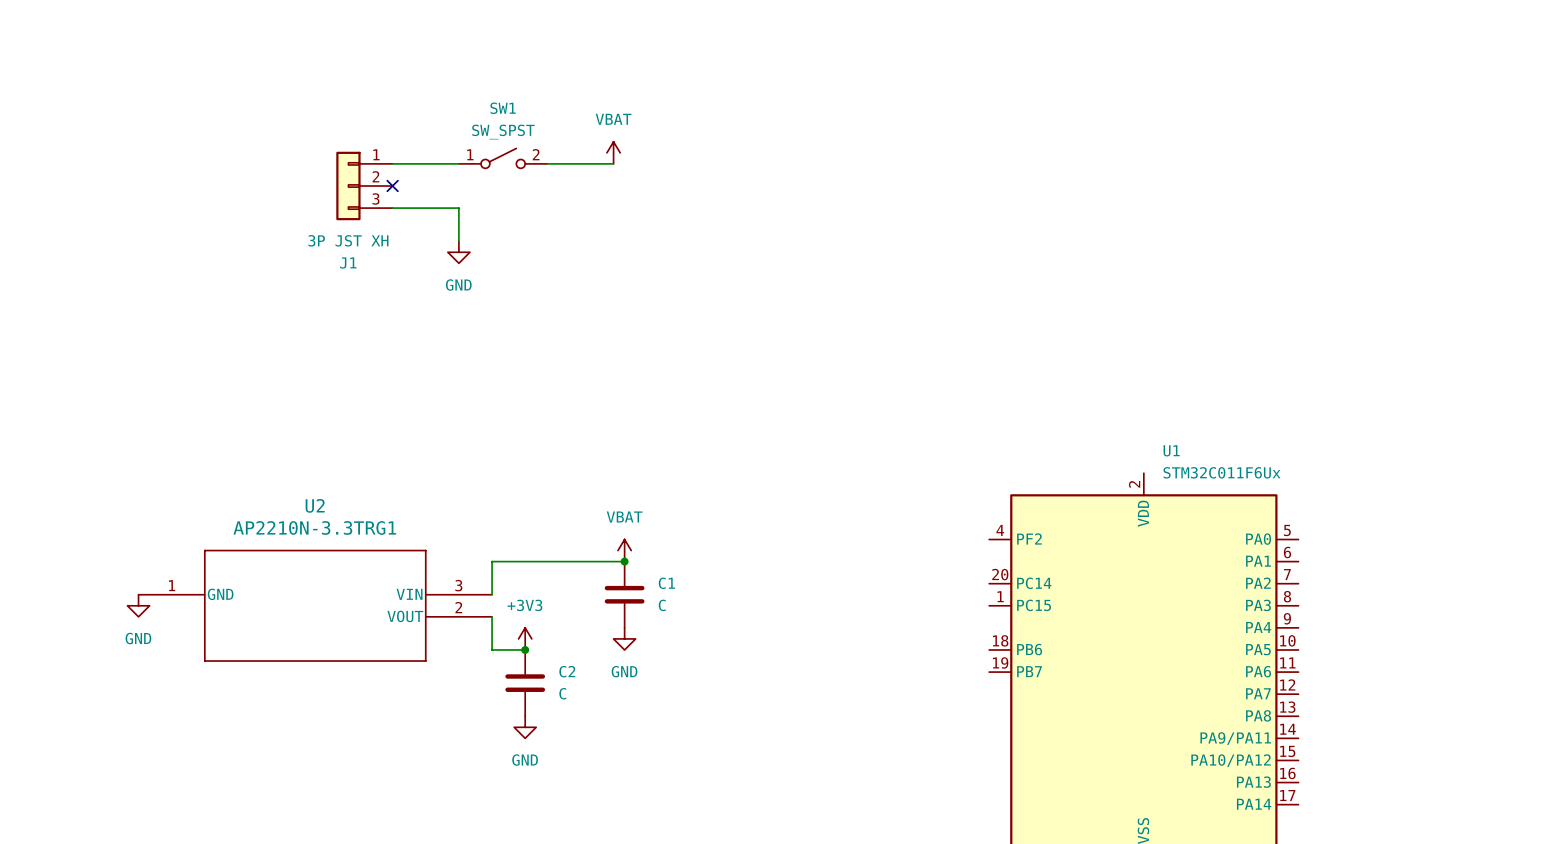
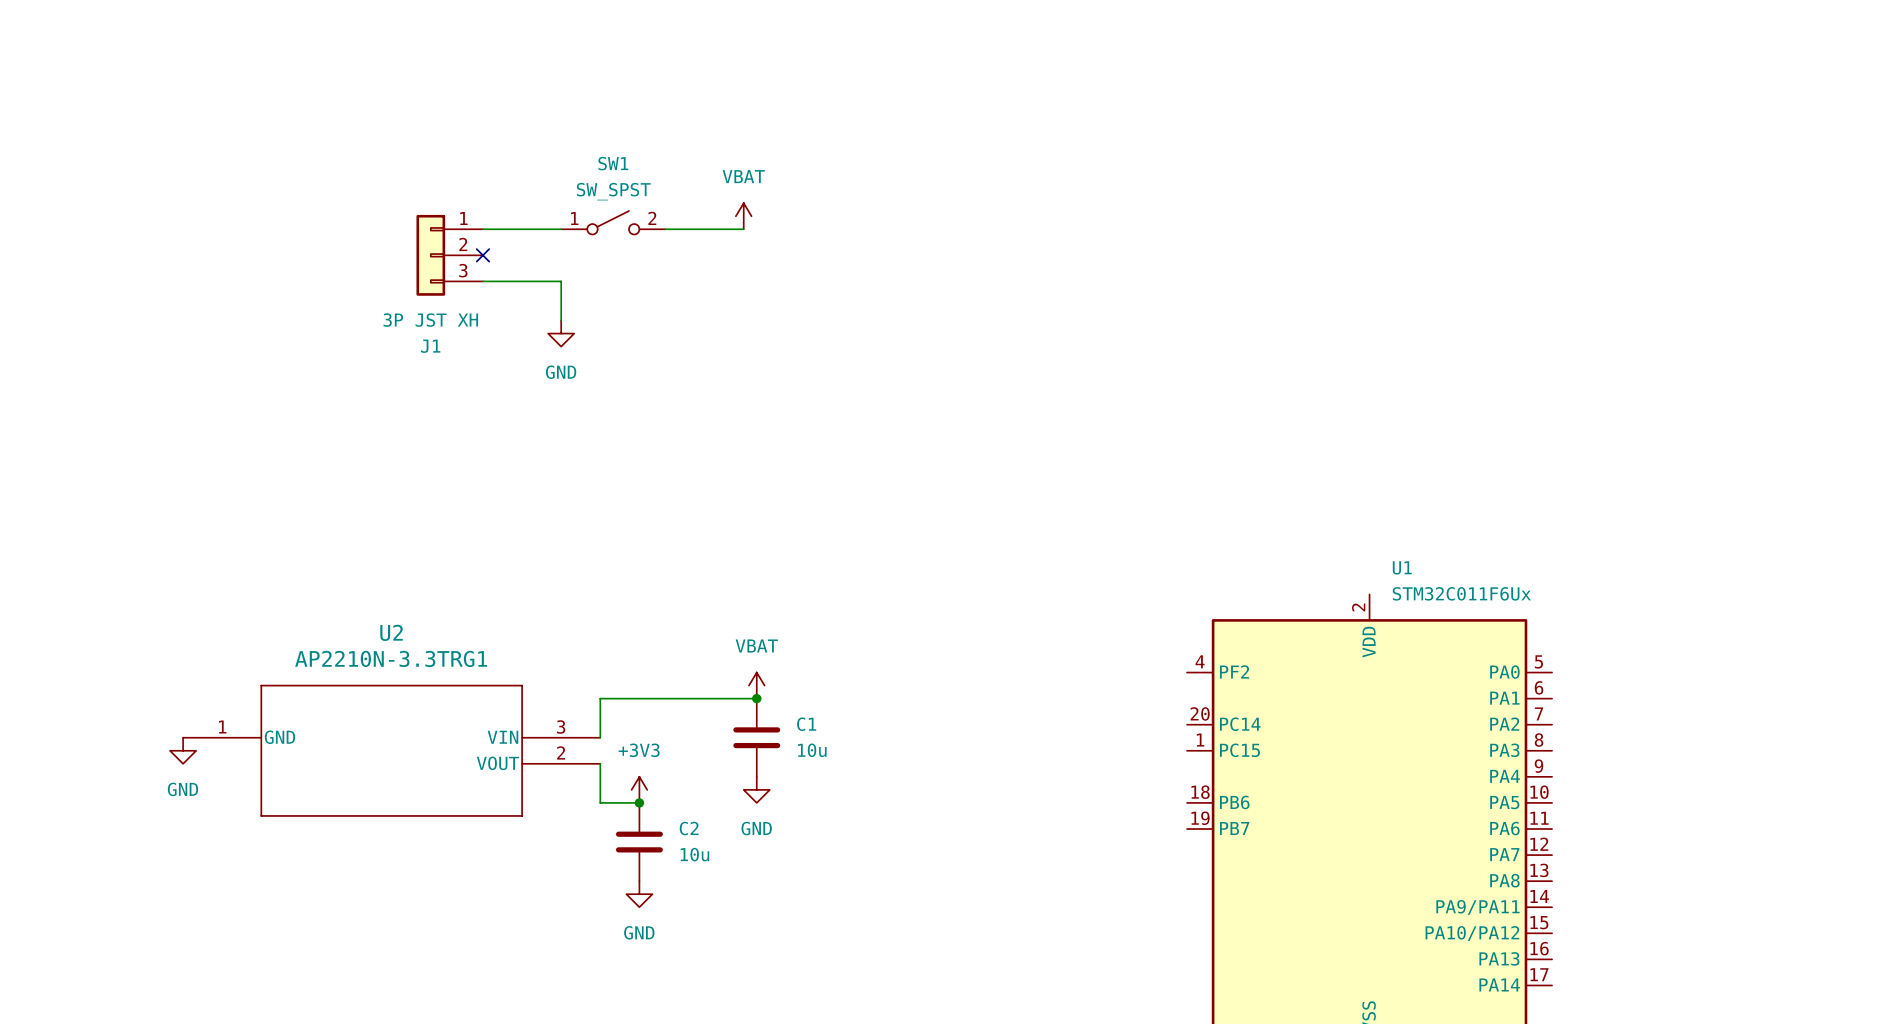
C1 value: C (662, 605) -> 10u (812, 750)
C2 value: C (562, 693) -> 10u (694, 854)

